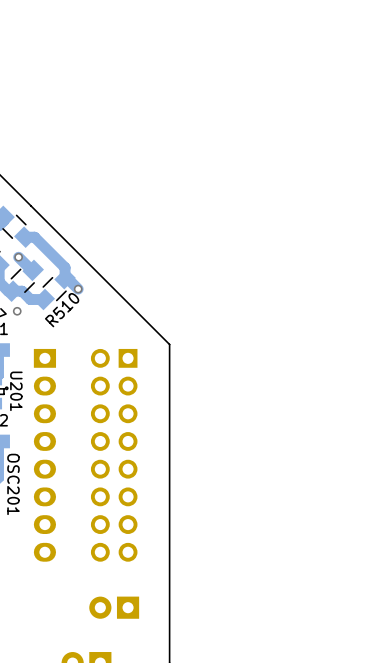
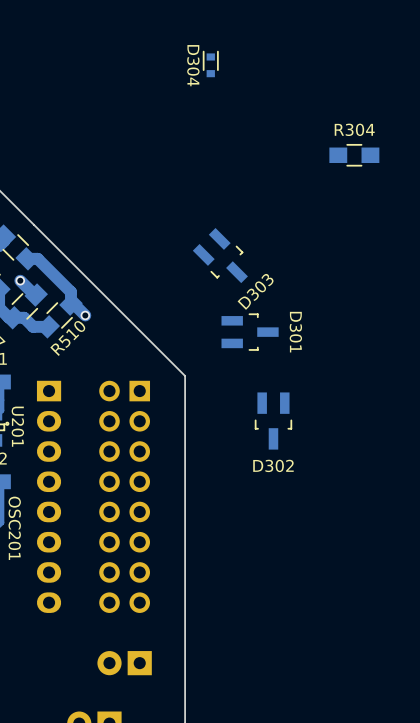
D304: none -> (210, 63)
R304: none -> (354, 155)
D303: none -> (220, 255)
D301: none -> (250, 332)
via: (17, 311) -> none
D302: none -> (273, 421)

